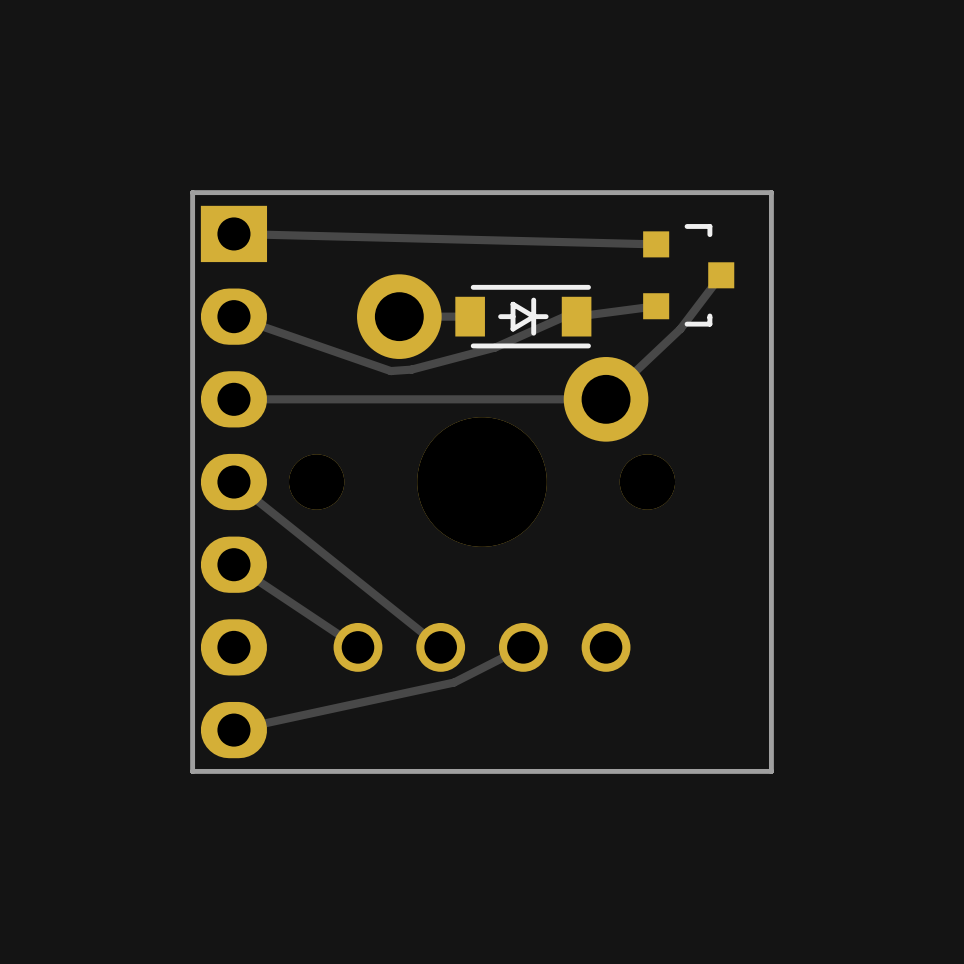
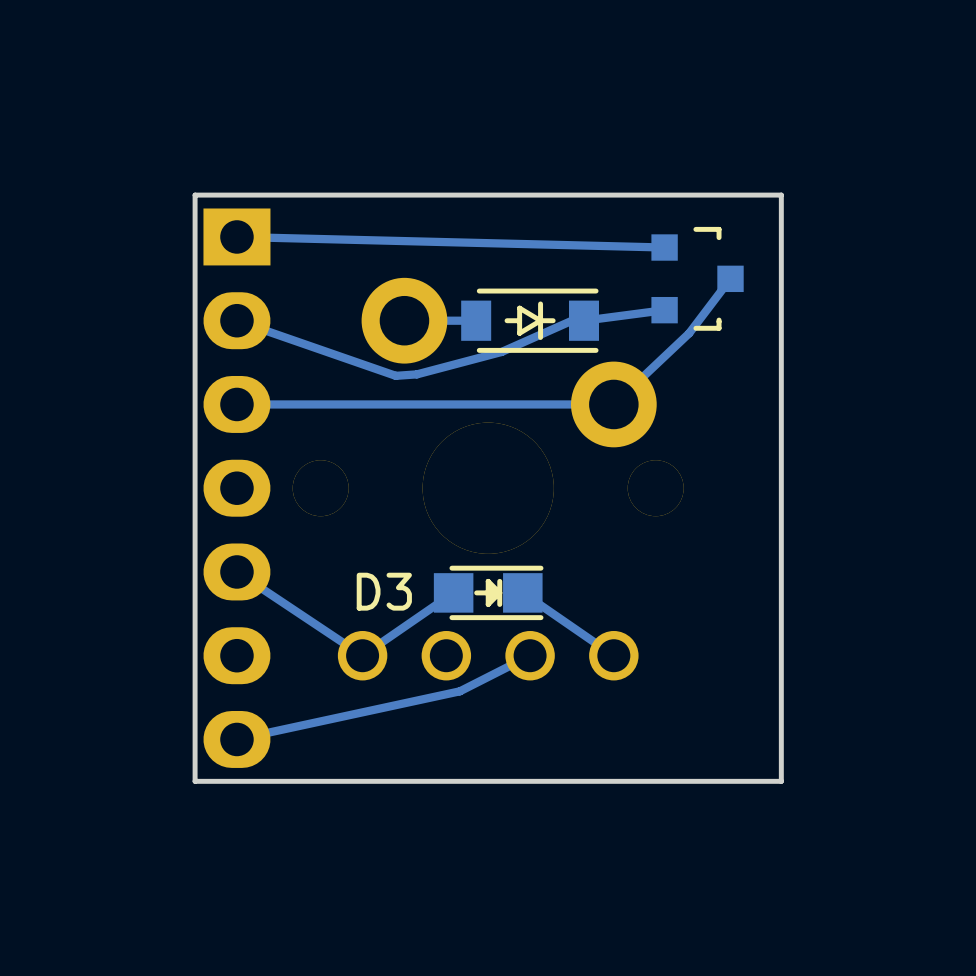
track: (233, 482) (440, 647) -> none
track: none -> (453, 592) (362, 655)
D3: none -> (488, 592)
track: none -> (522, 592) (613, 655)

